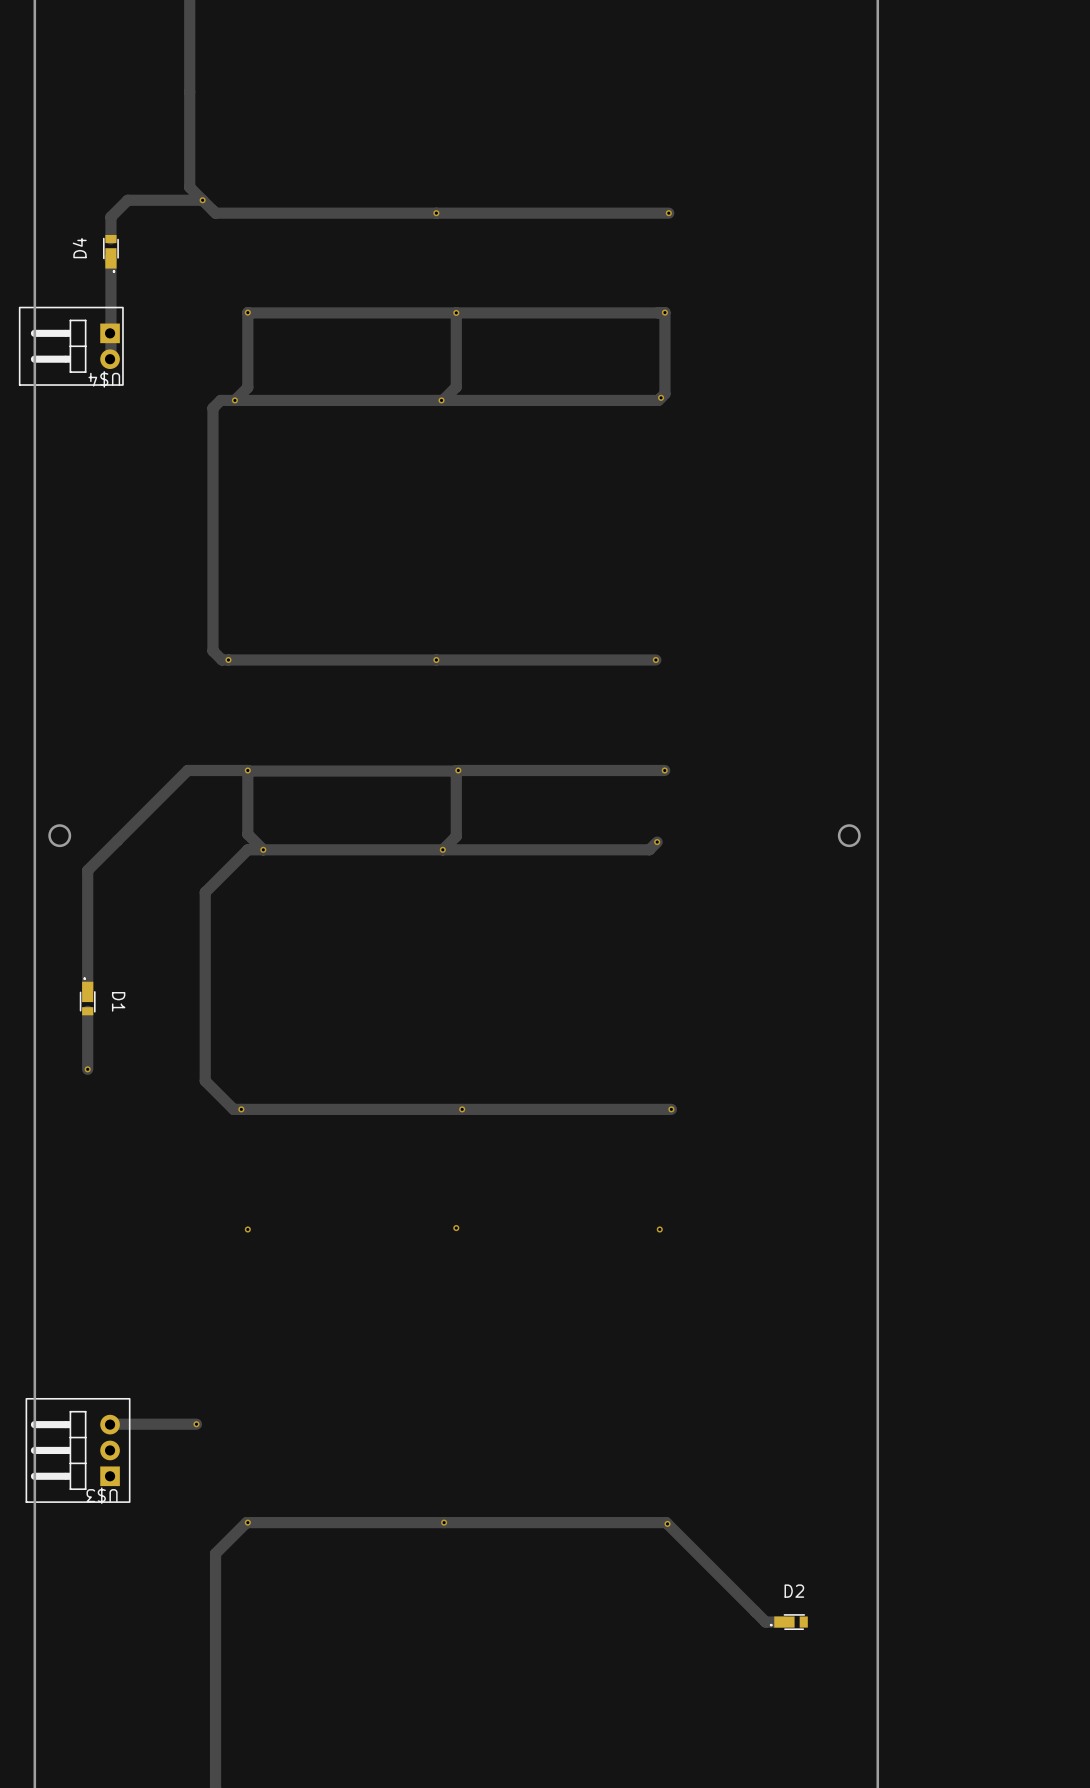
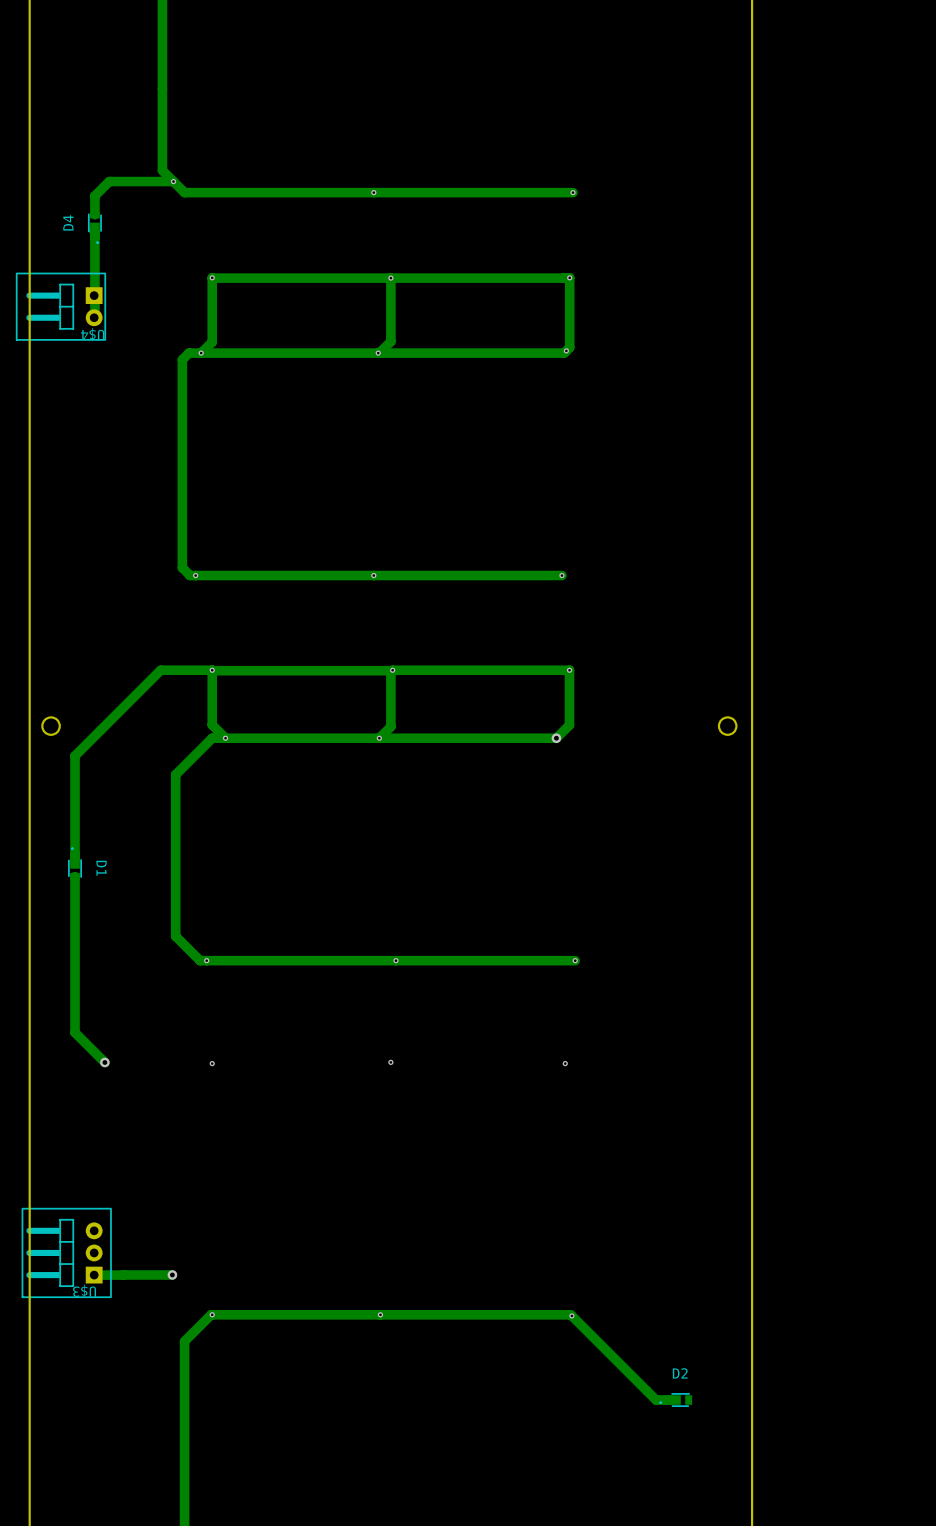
track: none -> (569, 670) (569, 725) (563, 731)
via: (657, 842) -> none
via: none -> (556, 738)
track: none -> (75, 926) (75, 1032) (104, 1062)
via: (87, 1069) -> none
via: none -> (104, 1062)
track: (196, 1424) (110, 1424) -> none
via: (196, 1424) -> none
track: none -> (123, 1275) (94, 1275)
track: none -> (172, 1274) (123, 1274)
via: none -> (172, 1274)

